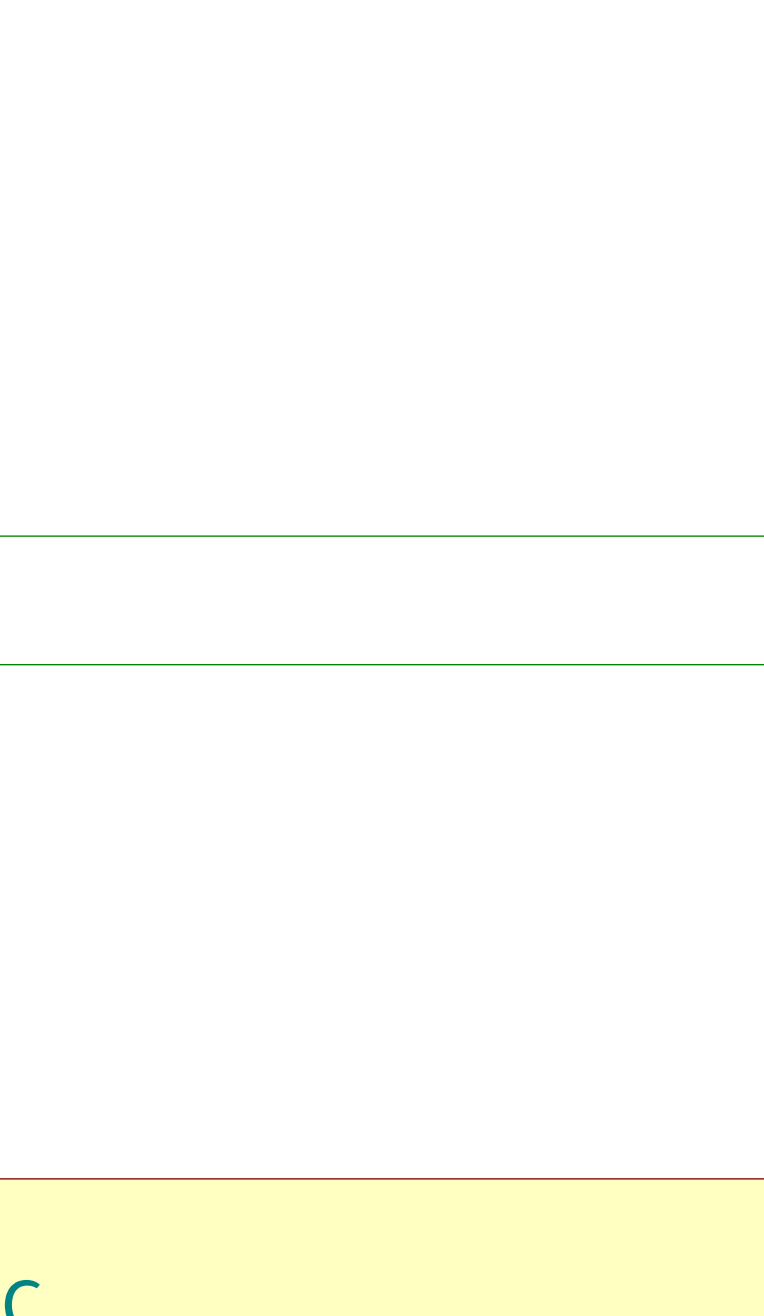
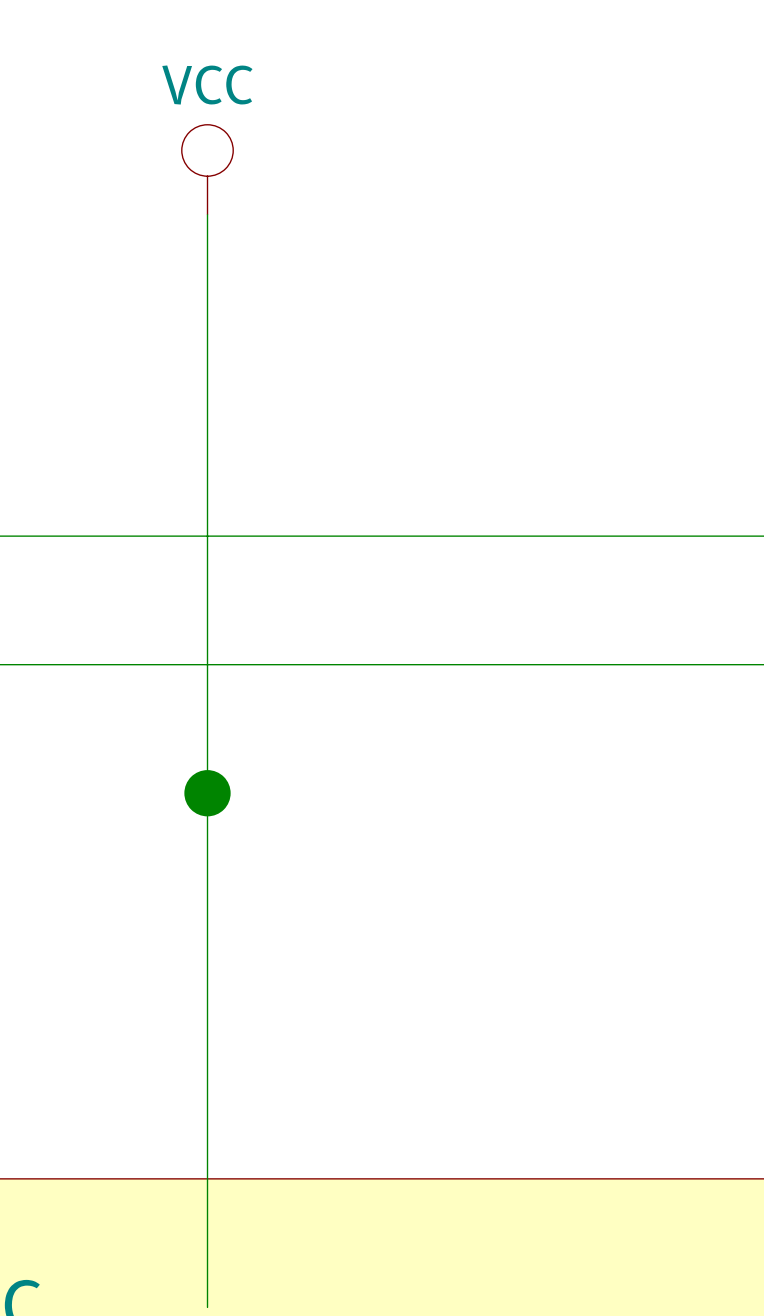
power symbol: none -> VCC (207, 169)
wire: none -> (207, 214) (207, 1307)
junction: none -> (207, 793)

